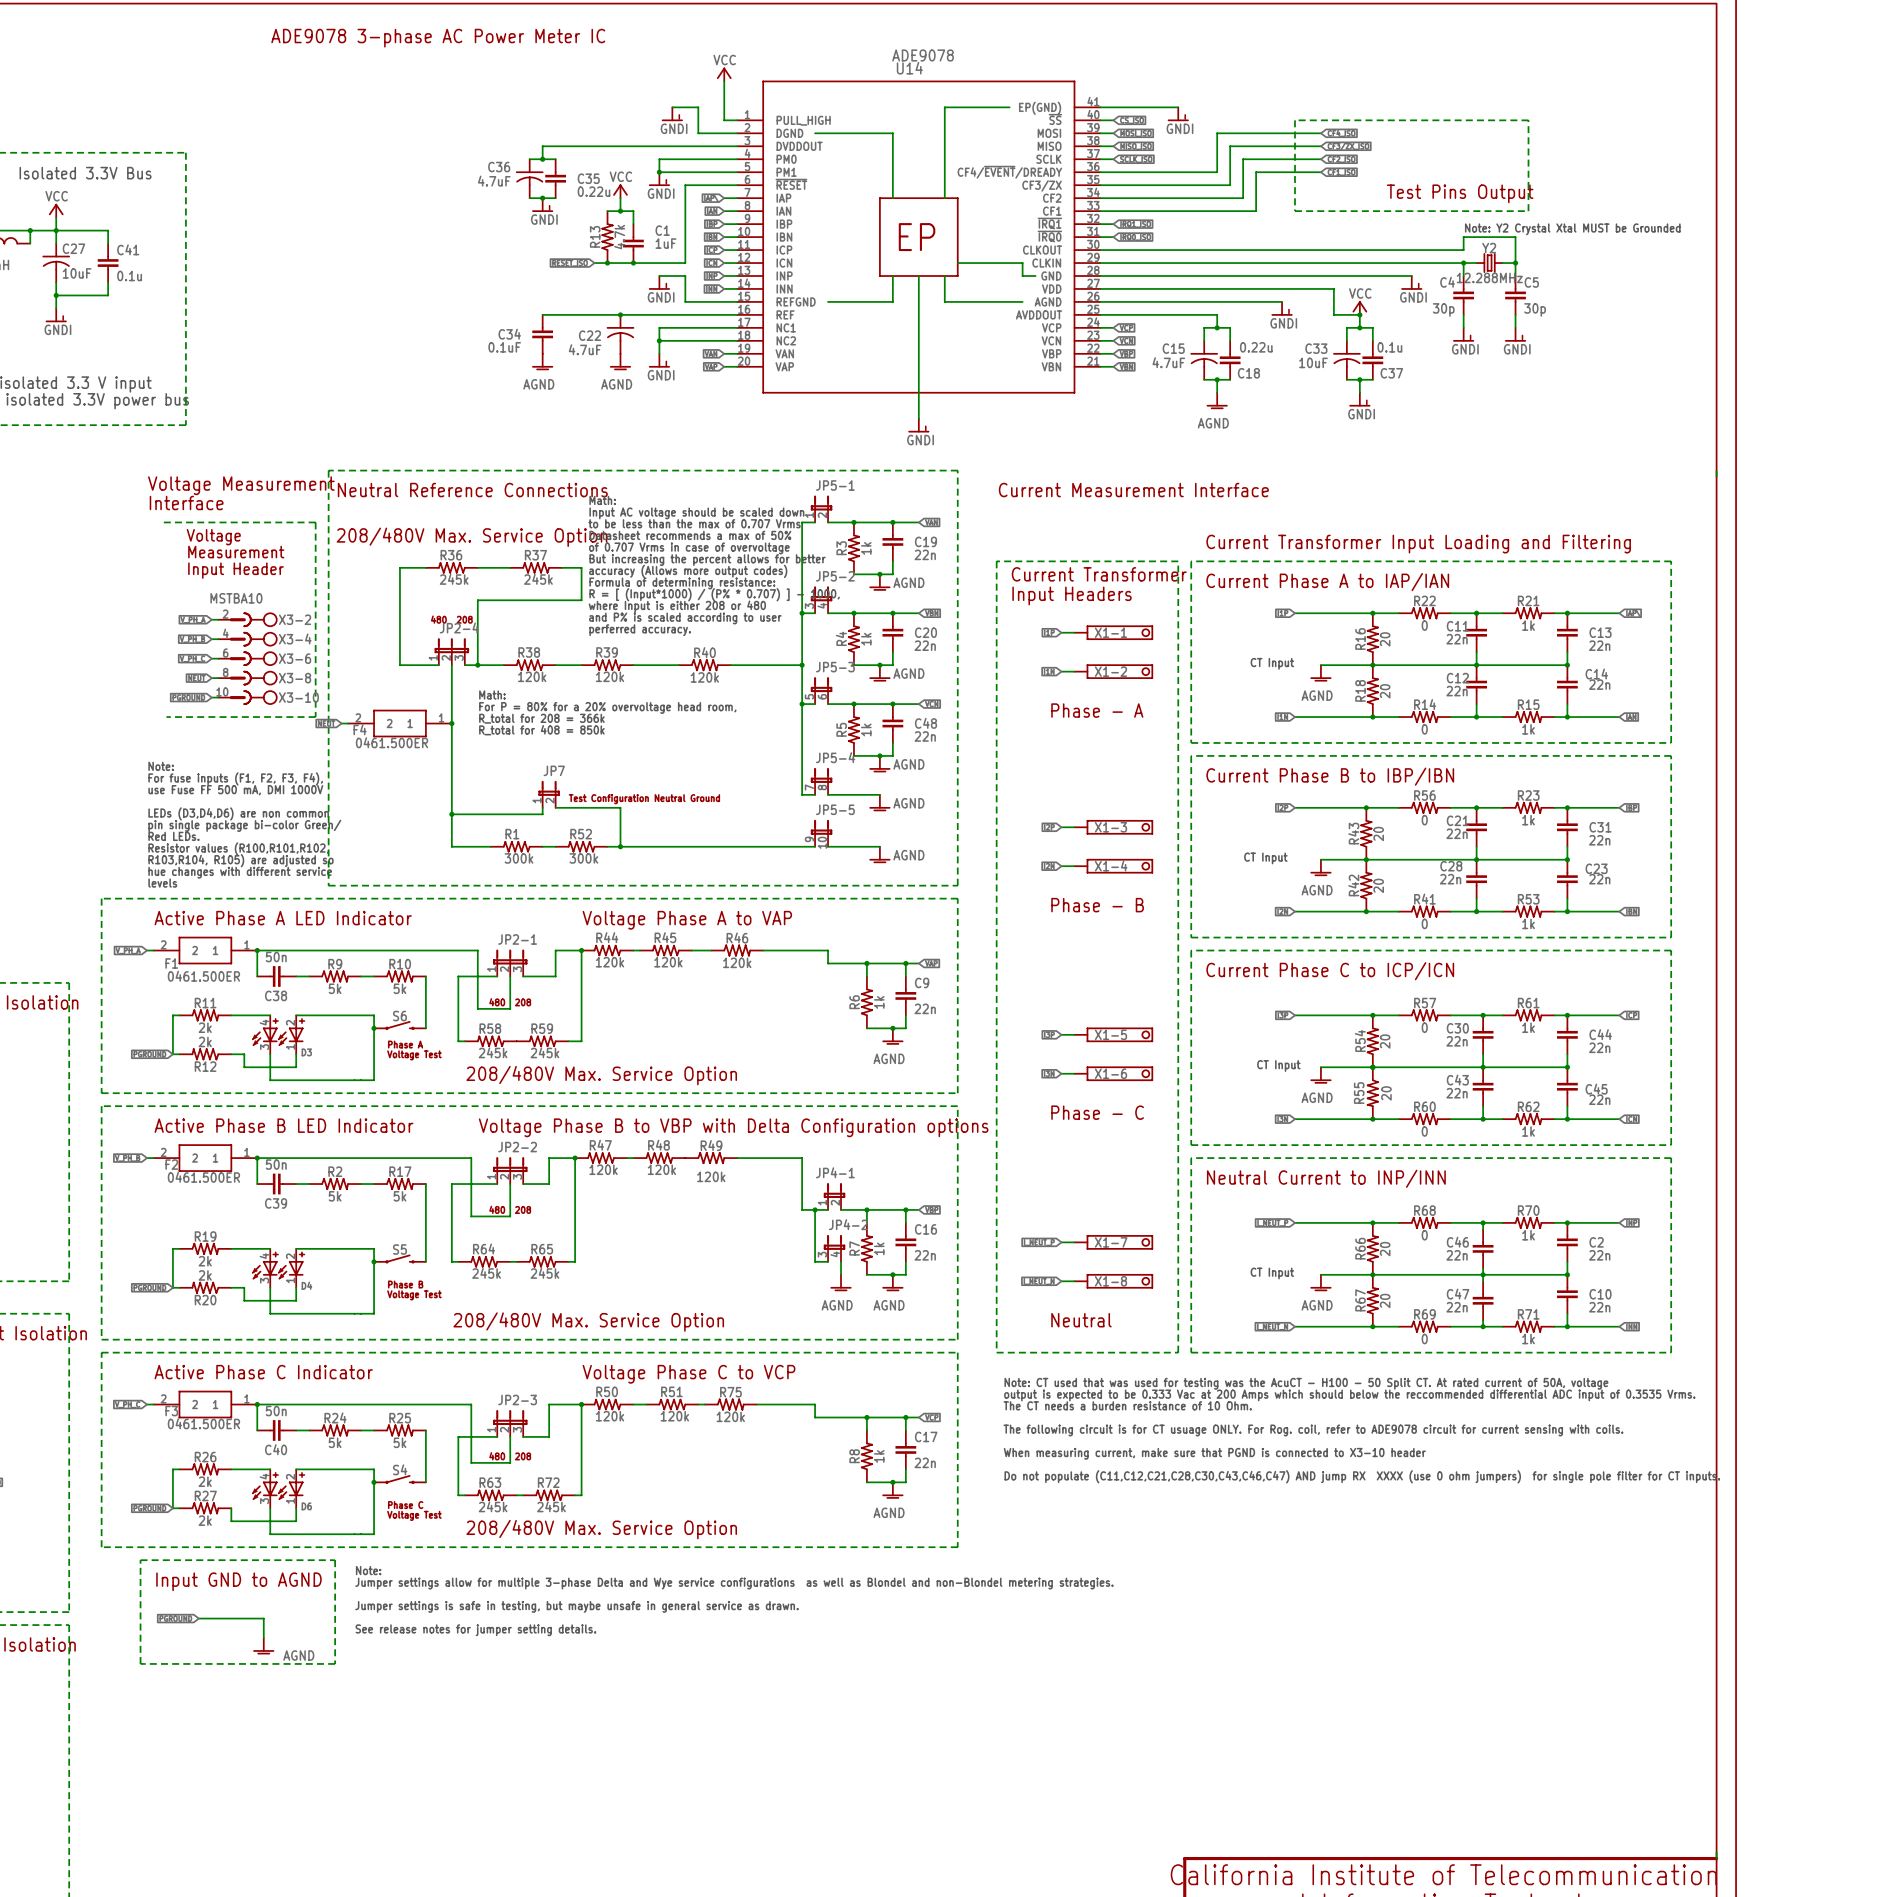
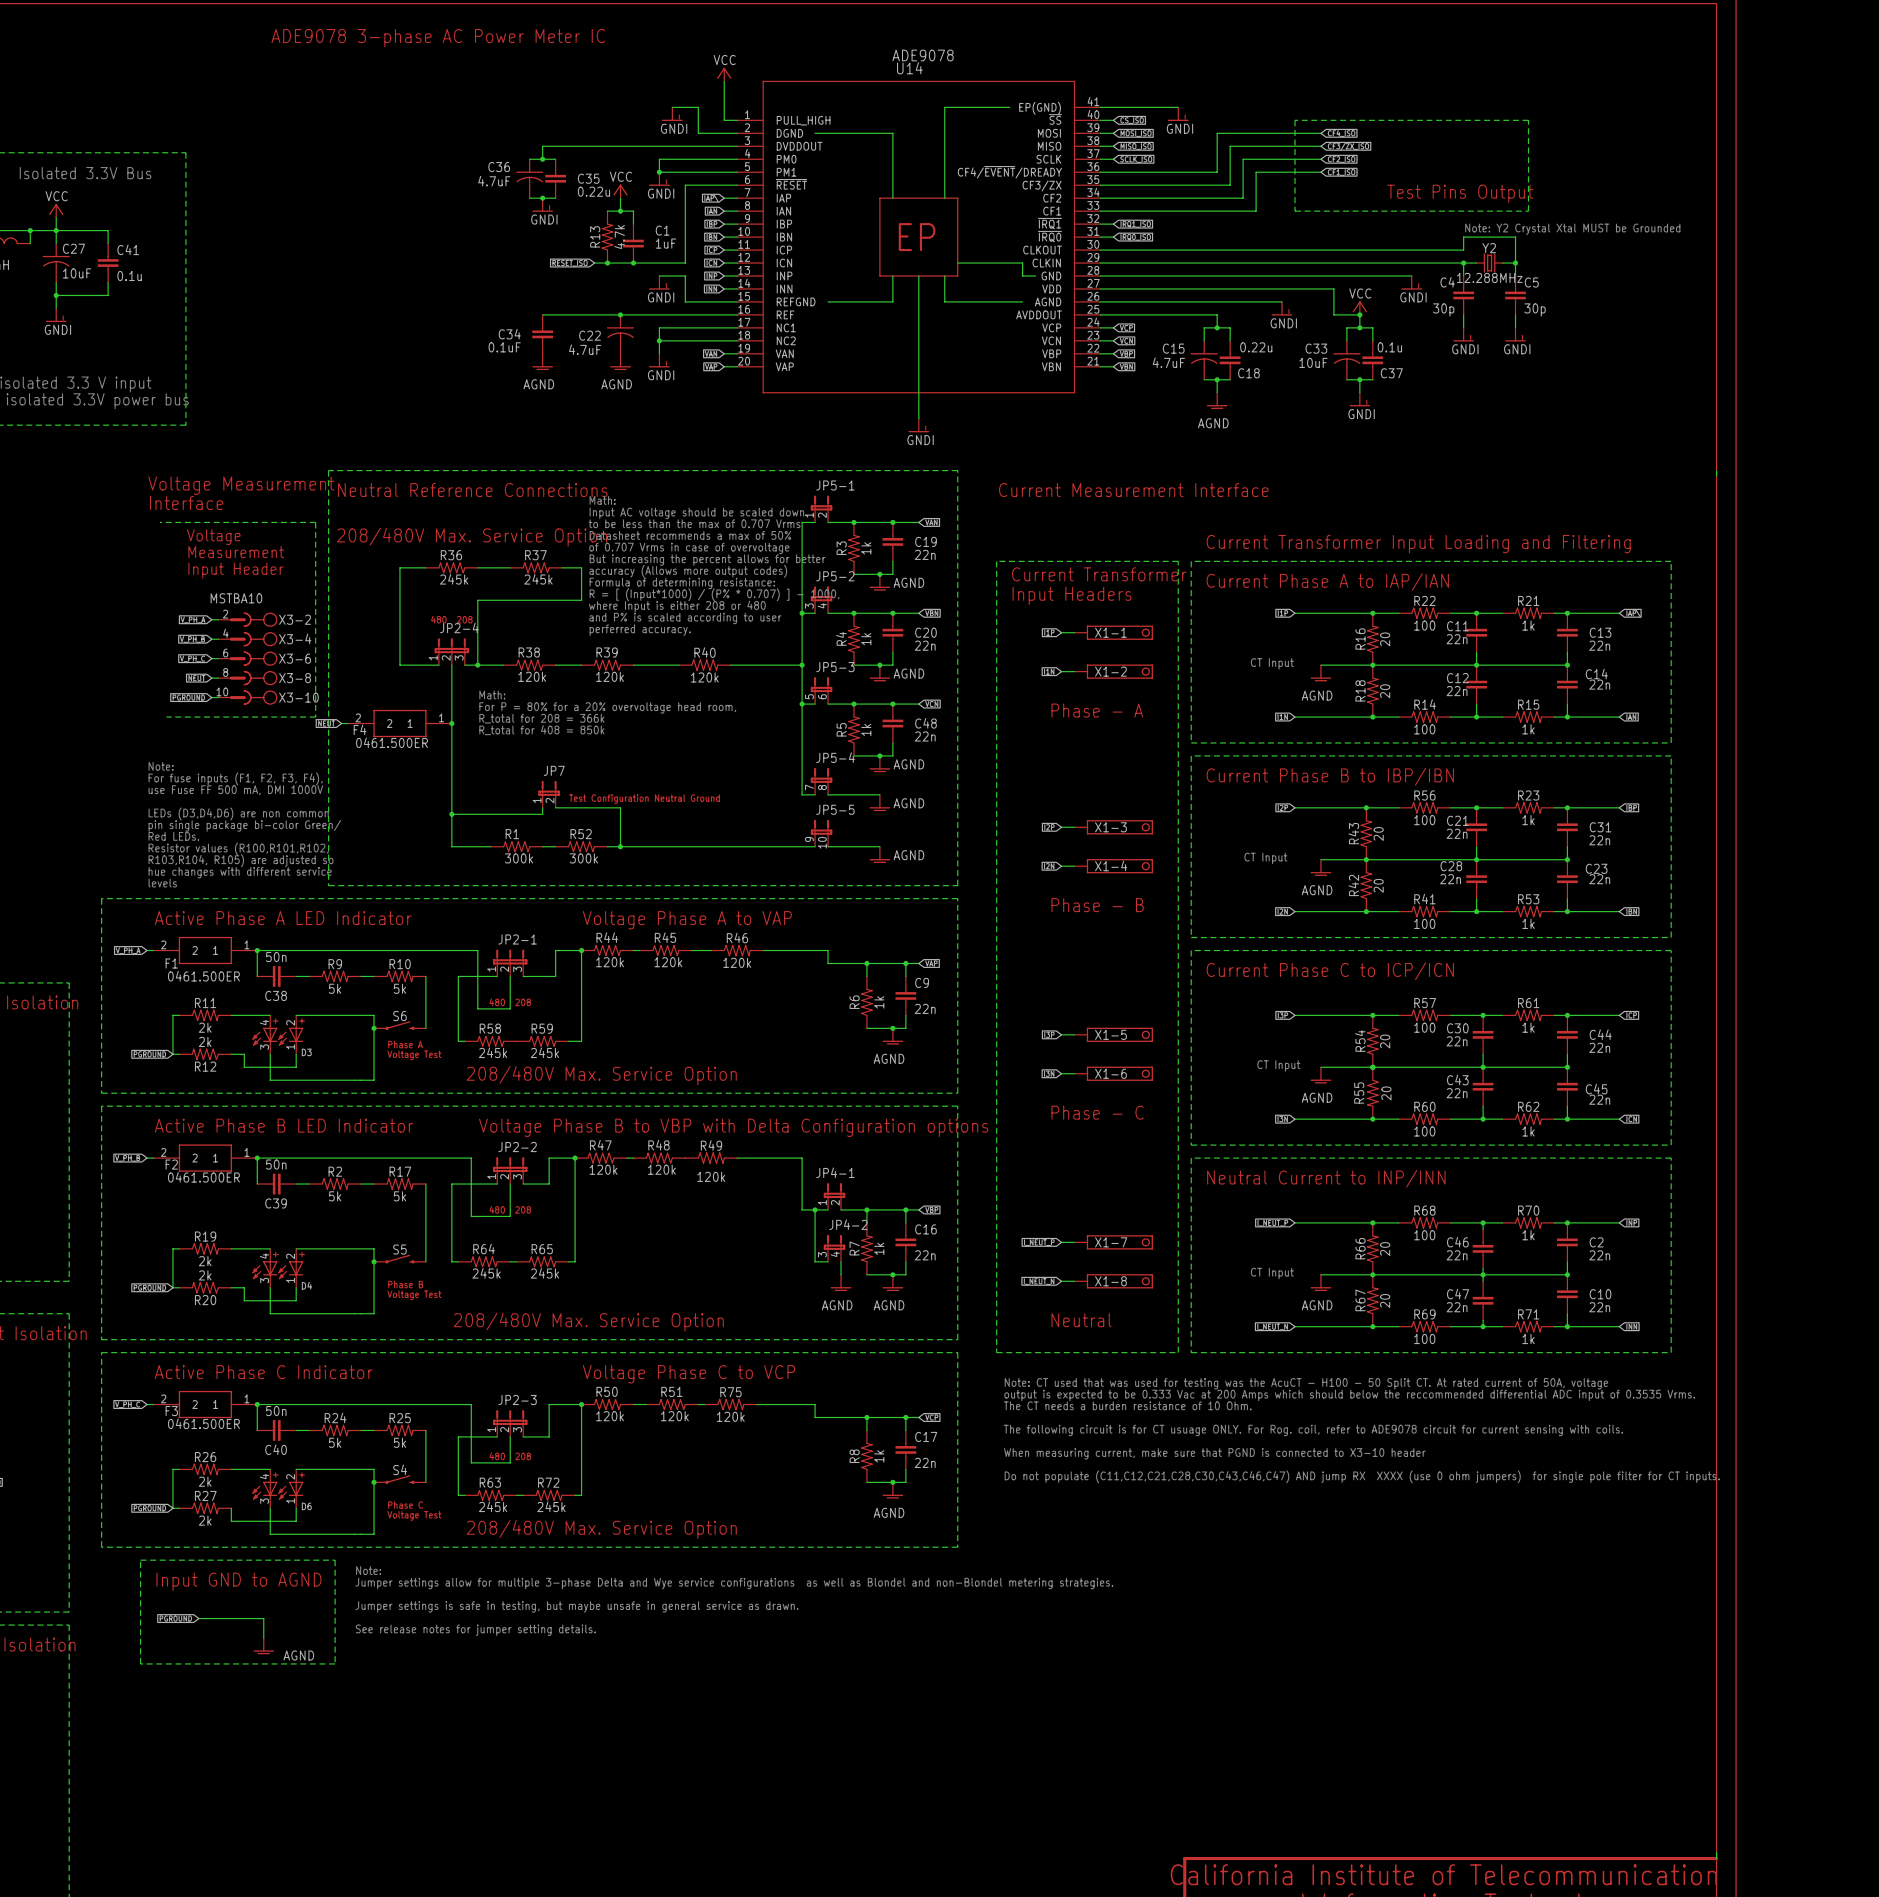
R22 value: 0 (1424, 625) -> 100 (1424, 625)
R14 value: 0 (1424, 729) -> 100 (1424, 729)
R56 value: 0 (1424, 820) -> 100 (1424, 820)
R41 value: 0 (1424, 923) -> 100 (1424, 923)
R57 value: 0 (1424, 1027) -> 100 (1424, 1027)
R60 value: 0 (1424, 1131) -> 100 (1424, 1131)
R68 value: 0 (1424, 1235) -> 100 (1424, 1235)
R69 value: 0 (1424, 1339) -> 100 (1424, 1339)

